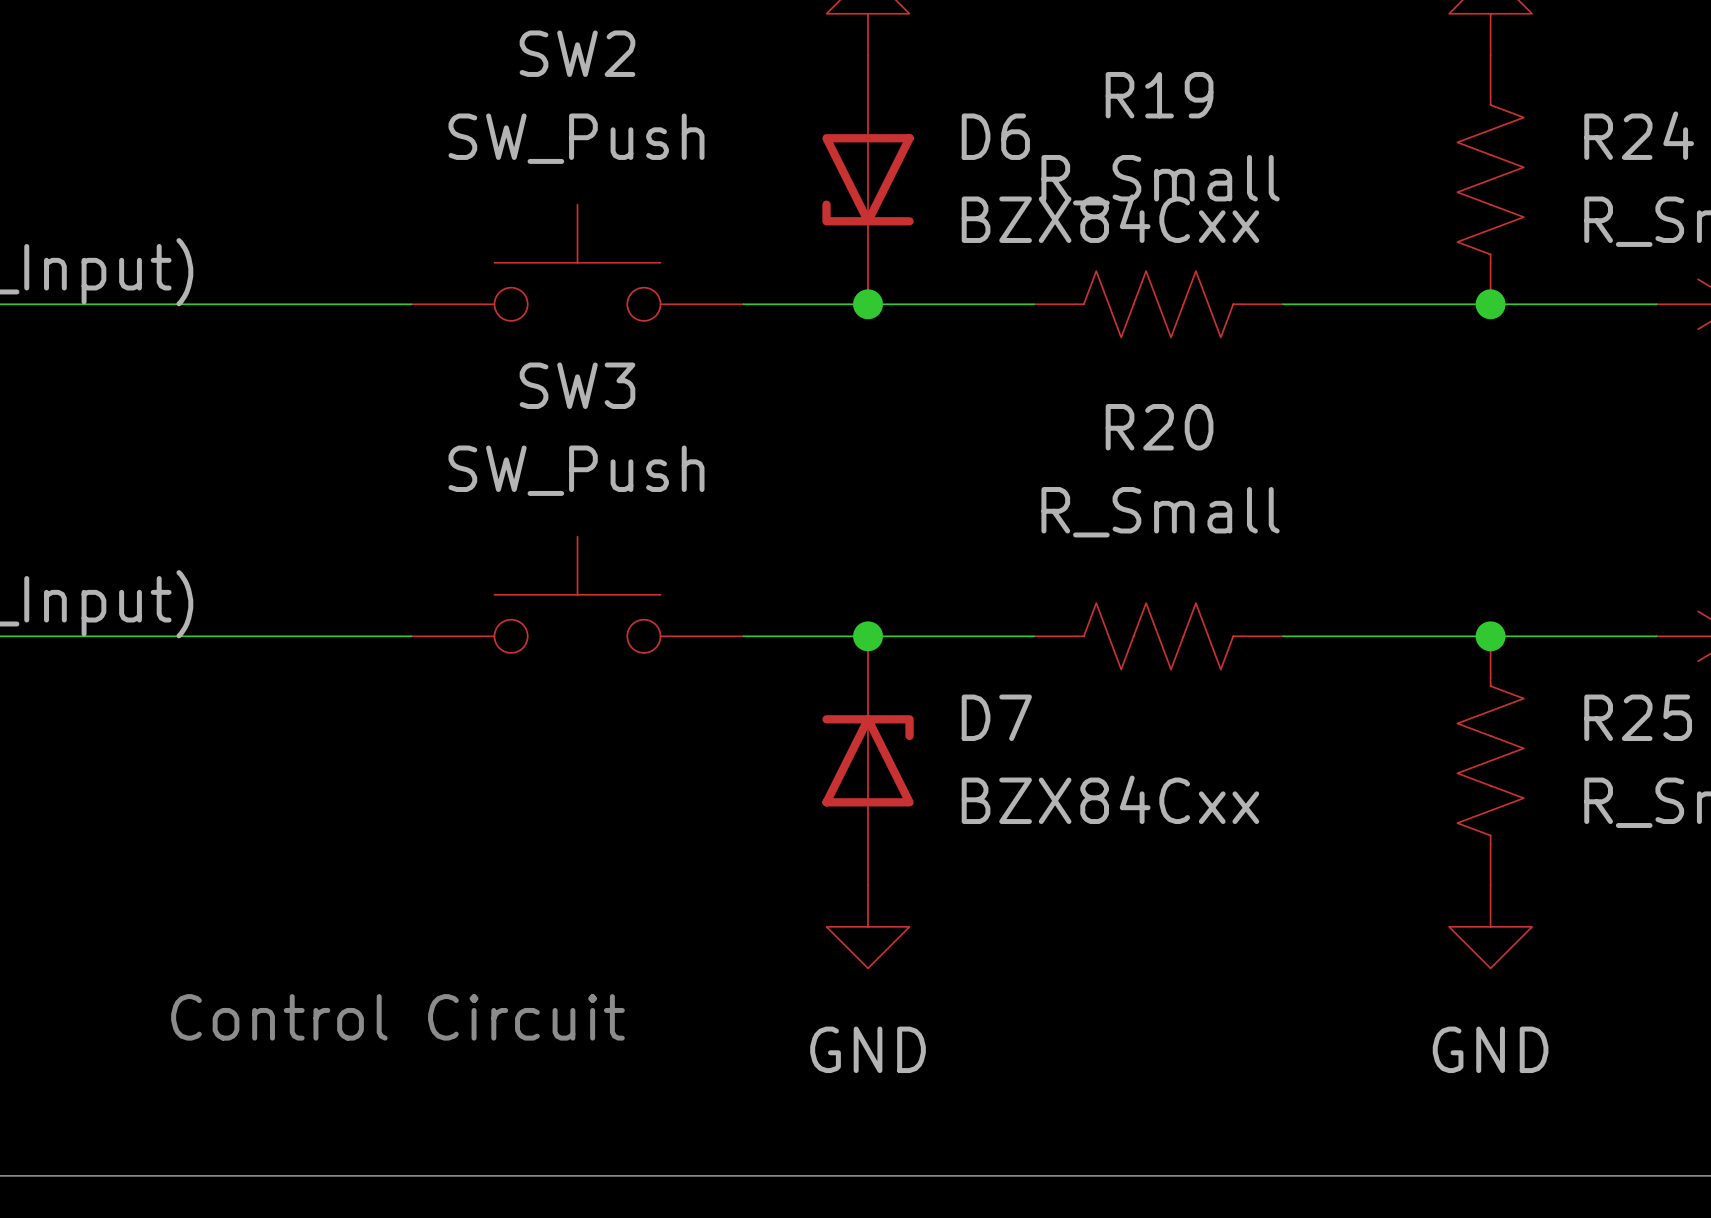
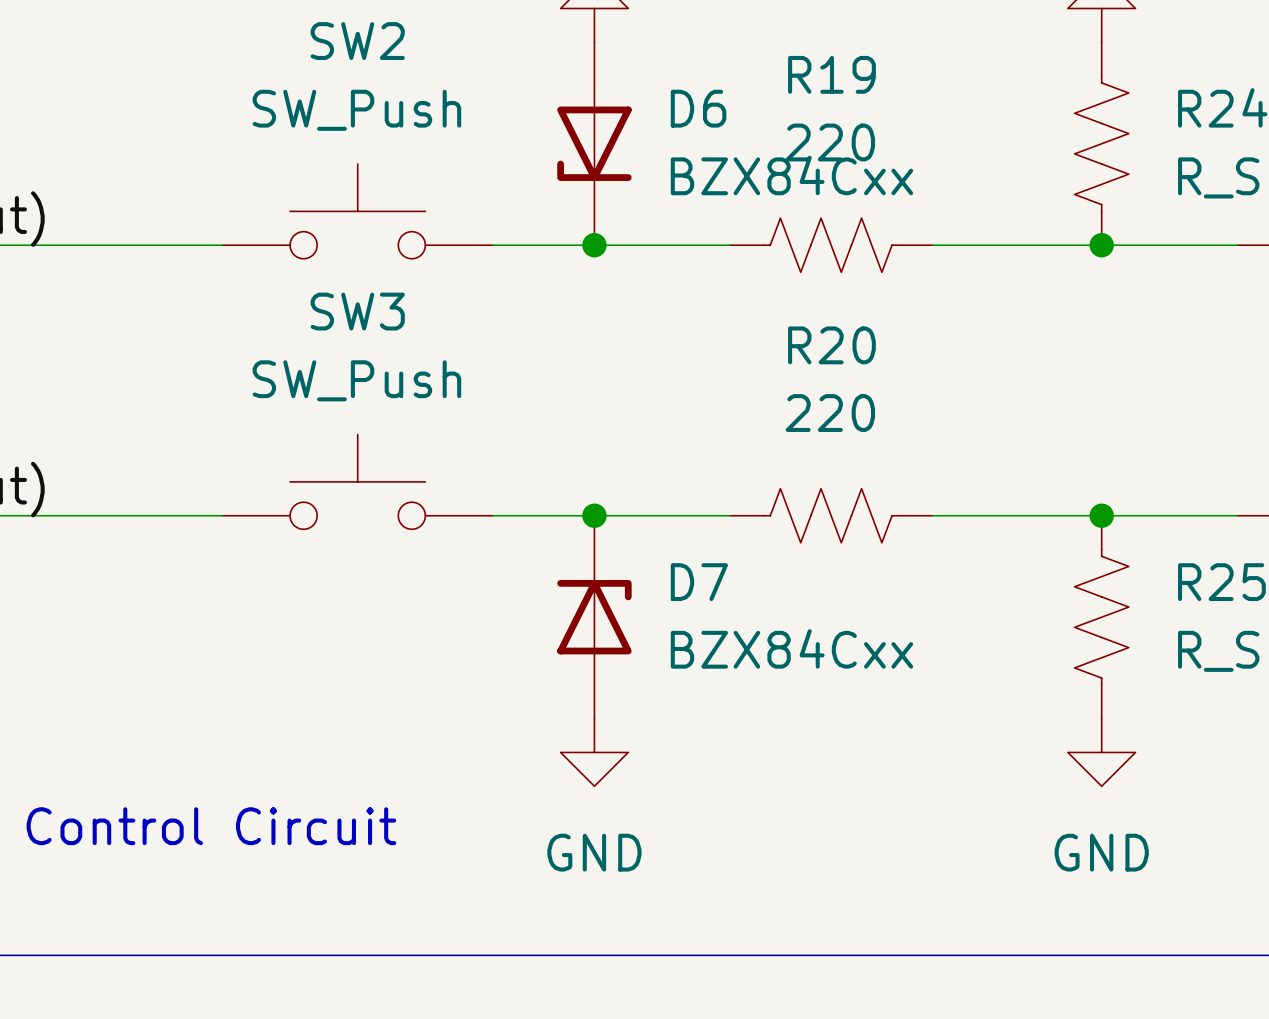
R19 value: R_Small (1160, 180) -> 220 (830, 142)
R20 value: R_Small (1160, 512) -> 220 (830, 413)

